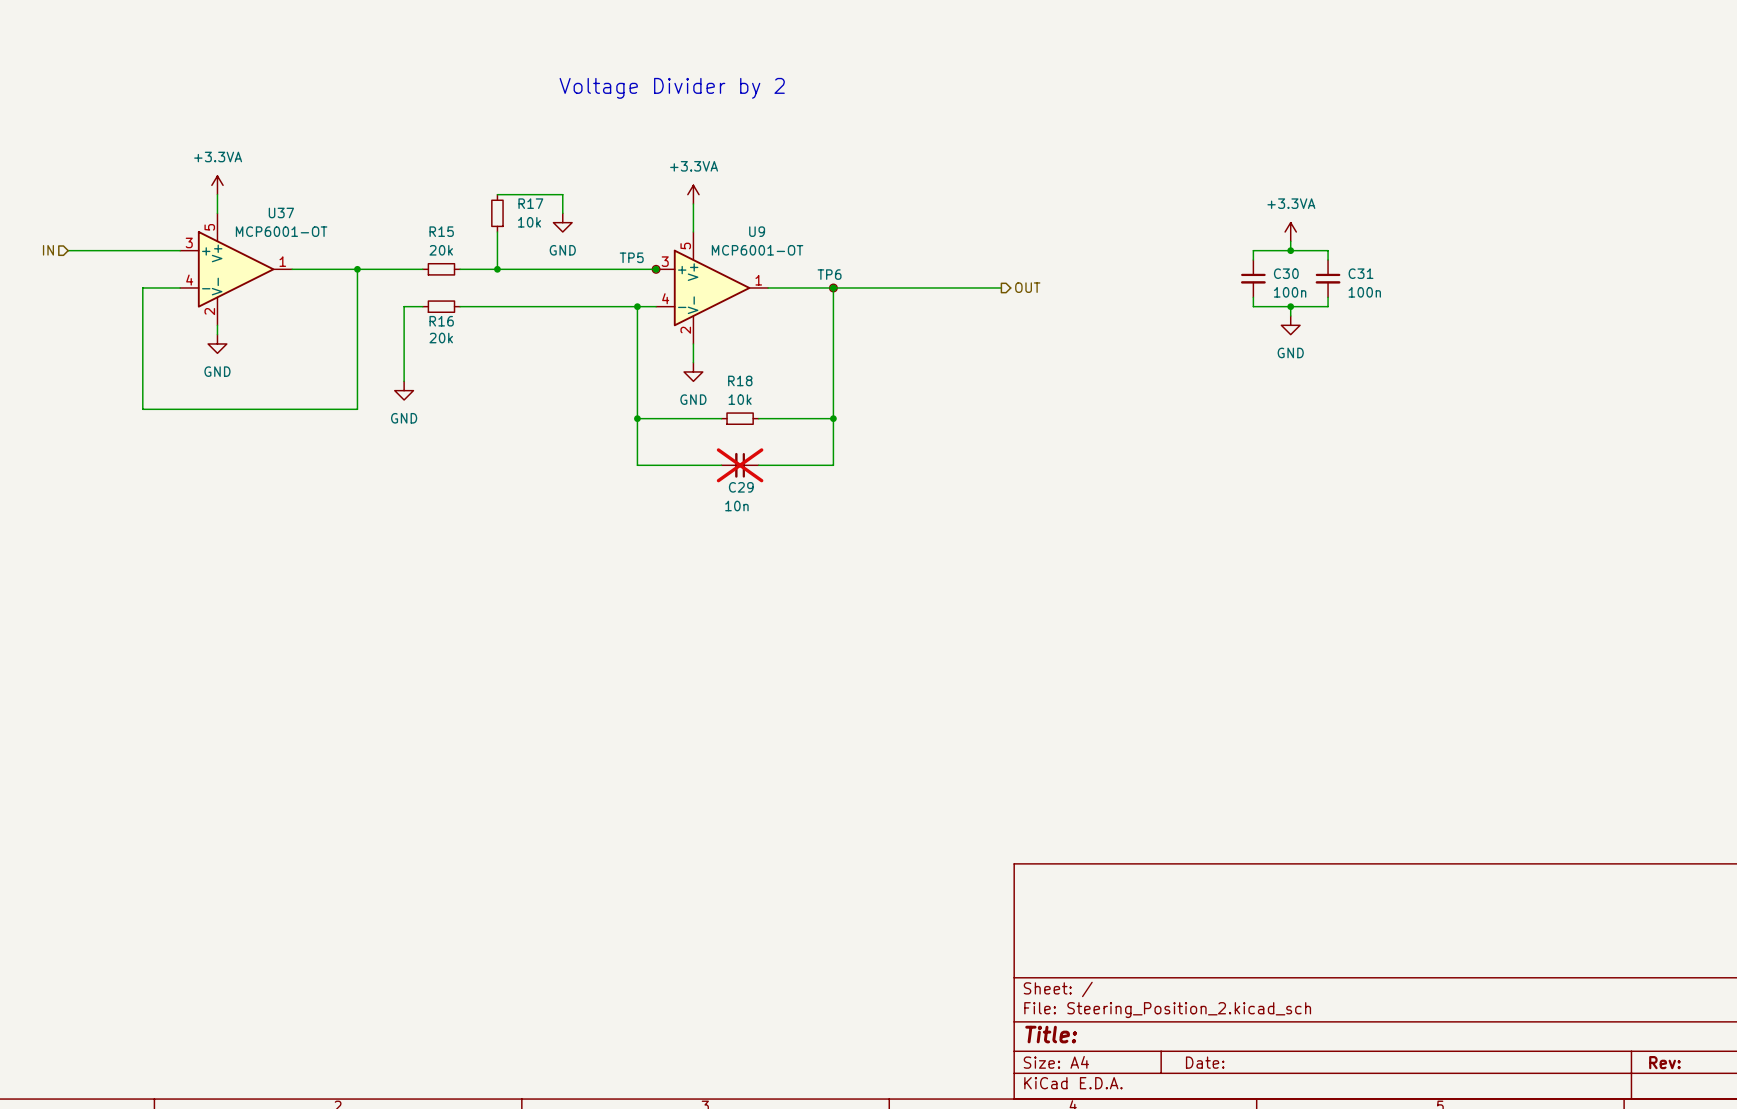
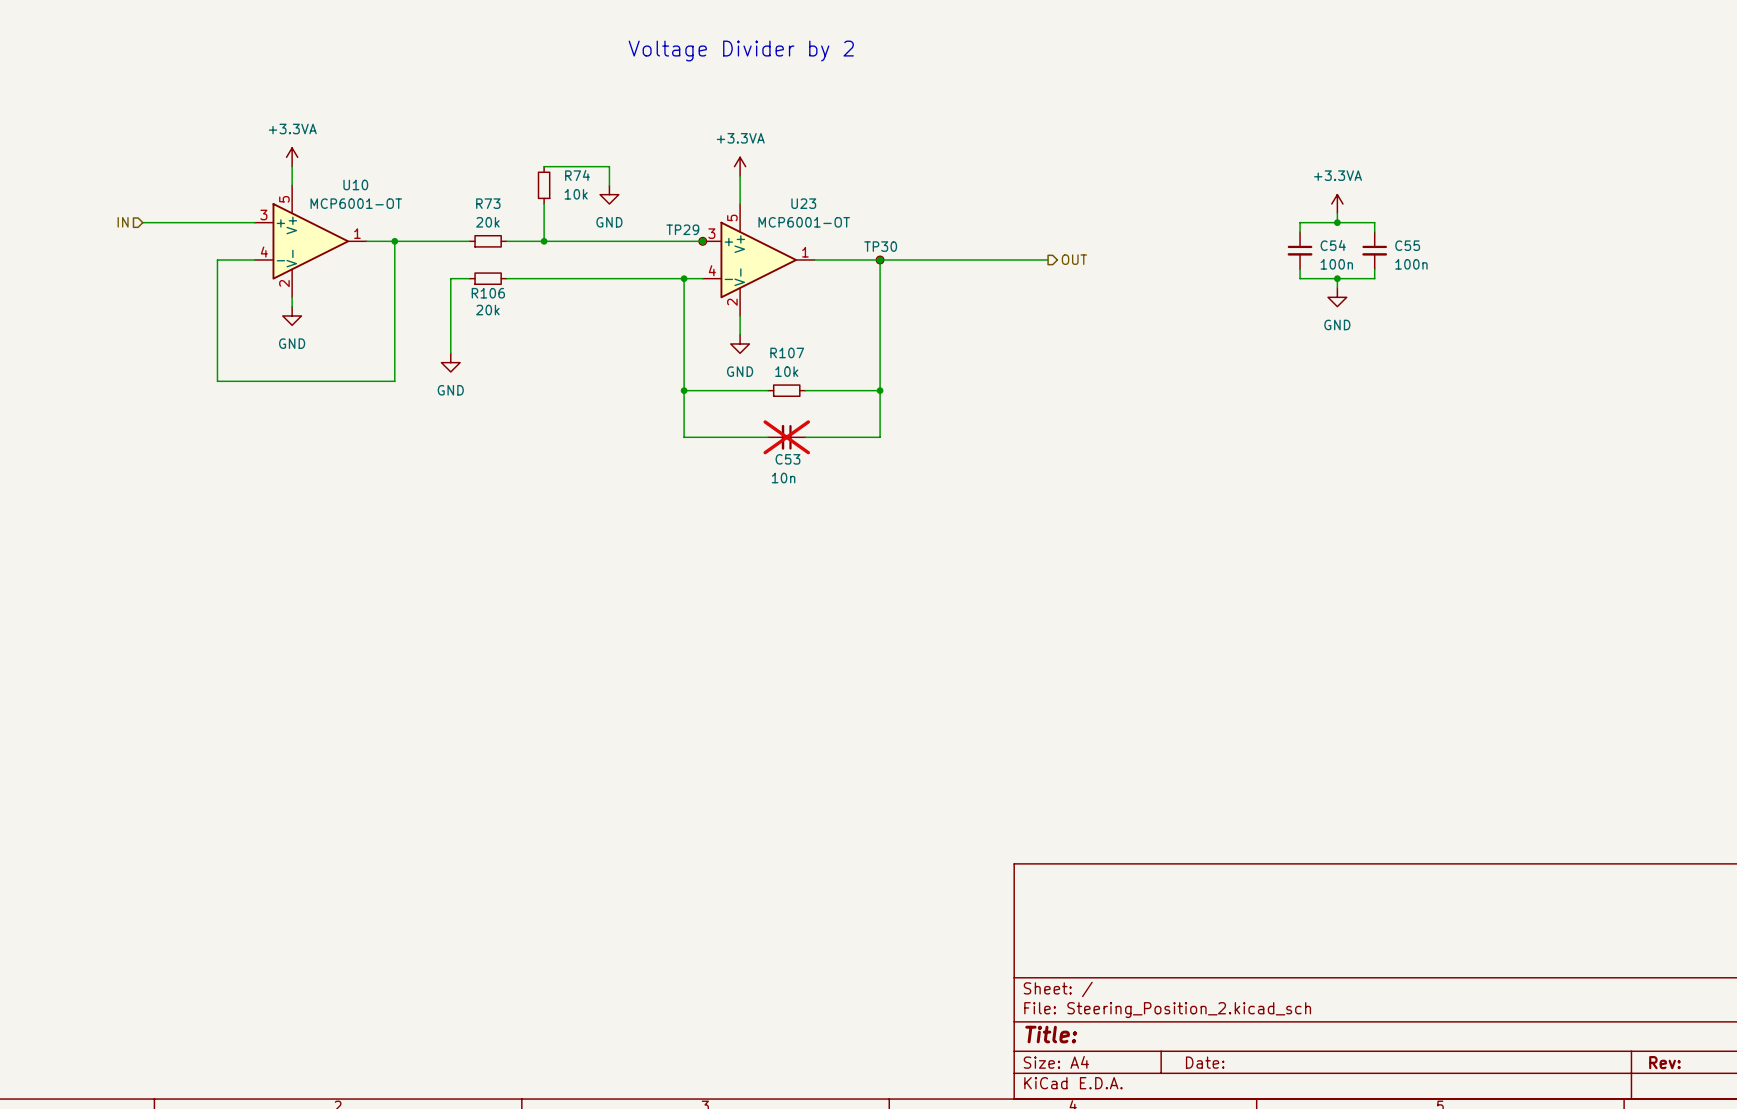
text position: Voltage Divider by 2 (672, 88) -> Voltage Divider by 2 (741, 51)
power symbol position: +3.3VA (217, 185) -> +3.3VA (292, 157)
R74: none -> 10k (544, 185)
wire: (217, 194) (217, 213) -> (292, 166) (292, 185)
wire: (497, 194) (562, 194) (562, 213) -> (544, 166) (609, 166) (609, 185)
power symbol position: +3.3VA (693, 194) -> +3.3VA (740, 166)
wire: (693, 203) (693, 231) -> (740, 176) (740, 203)
R17: 10k (497, 213) -> none
power symbol position: GND (562, 222) -> GND (609, 194)
junction: none -> (1337, 222)
wire: (497, 231) (497, 269) -> (544, 203) (544, 241)
power symbol position: +3.3VA (1290, 231) -> +3.3VA (1337, 203)
U10: none -> MCP6001-OT (310, 241)
wire: none -> (366, 241) (469, 241)
wire: none -> (394, 241) (394, 381) (217, 381) (217, 334)
junction: none -> (394, 241)
R73: none -> 20k (488, 241)
junction: none -> (544, 241)
junction: none -> (702, 241)
TP29: none -> (702, 241)
wire: (1290, 241) (1290, 250) -> (1337, 213) (1337, 222)
hierarchical label position: IN (48, 250) -> IN (123, 222)
wire: (68, 250) (180, 250) -> (142, 222) (254, 222)
junction: (1290, 250) -> none
C54: none -> 100n (1300, 250)
C55: none -> 100n (1374, 250)
U23: none -> MCP6001-OT (758, 259)
junction: none -> (880, 259)
TP30: none -> (880, 259)
wire: (1253, 259) (1253, 250) (1328, 250) (1328, 259) -> (1300, 231) (1300, 222) (1374, 222) (1374, 231)
U37: MCP6001-OT (236, 269) -> none
wire: (292, 269) (422, 269) -> none
wire: (357, 269) (357, 409) (142, 409) (142, 287) (180, 287) -> none
junction: (357, 269) -> none
R15: 20k (441, 269) -> none
wire: (460, 269) (656, 269) -> (506, 241) (702, 241)
junction: (497, 269) -> none
junction: (656, 269) -> none
TP5: (656, 269) -> none
R106: none -> 20k (488, 278)
junction: none -> (684, 278)
C30: 100n (1253, 278) -> none
C31: 100n (1328, 278) -> none
junction: none -> (1337, 278)
U9: MCP6001-OT (712, 287) -> none
wire: (768, 287) (1001, 287) -> (814, 259) (1048, 259)
wire: (833, 287) (833, 465) (758, 465) -> (880, 259) (880, 437) (805, 437)
junction: (833, 287) -> none
TP6: (833, 287) -> none
hierarchical label position: OUT (1027, 287) -> OUT (1074, 259)
wire: none -> (292, 297) (292, 306)
wire: (1253, 297) (1253, 306) (1328, 306) (1328, 297) -> (1300, 269) (1300, 278) (1374, 278) (1374, 269)
wire: (422, 306) (404, 306) (404, 381) -> (469, 278) (450, 278) (450, 353)
R16: 20k (441, 306) -> none
wire: (460, 306) (656, 306) -> (506, 278) (702, 278)
wire: (637, 306) (637, 465) (721, 465) -> (684, 278) (684, 437) (768, 437)
junction: (637, 306) -> none
wire: (1290, 306) (1290, 315) -> (1337, 278) (1337, 287)
junction: (1290, 306) -> none
power symbol: none -> GND (292, 315)
power symbol position: GND (1290, 325) -> GND (1337, 297)
power symbol: GND (217, 343) -> none
wire: (693, 343) (693, 362) -> (740, 315) (740, 334)
power symbol position: GND (693, 371) -> GND (740, 343)
power symbol position: GND (404, 390) -> GND (450, 362)
junction: none -> (684, 390)
R107: none -> 10k (786, 390)
junction: none -> (880, 390)
wire: (637, 418) (721, 418) -> (684, 390) (768, 390)
junction: (637, 418) -> none
R18: 10k (740, 418) -> none
wire: (758, 418) (833, 418) -> (805, 390) (880, 390)
junction: (833, 418) -> none
C53: none -> 10n (786, 437)
C29: 10n (740, 465) -> none

